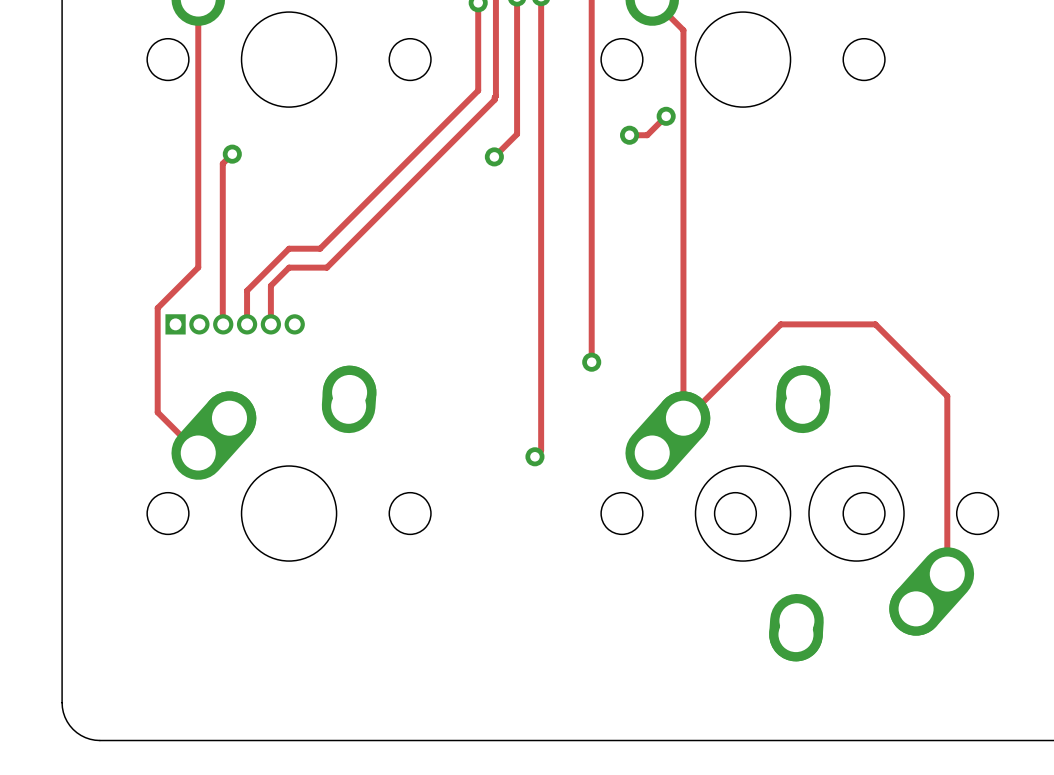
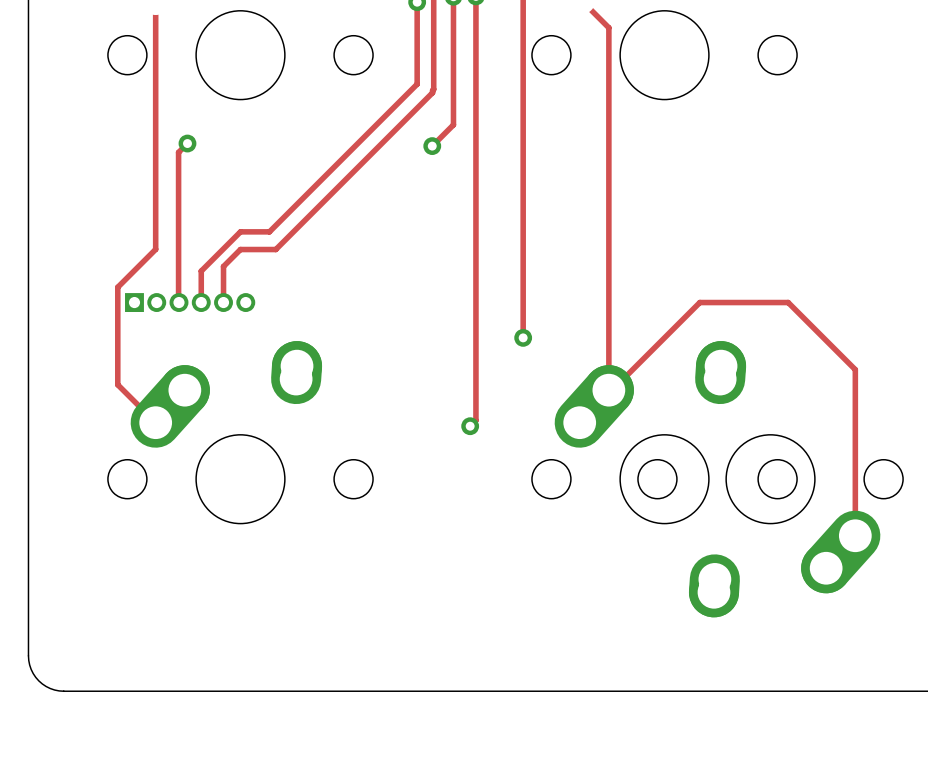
track: (666, 116) (647, 135) (629, 135) -> none
via: (666, 116) -> none
via: (629, 135) -> none

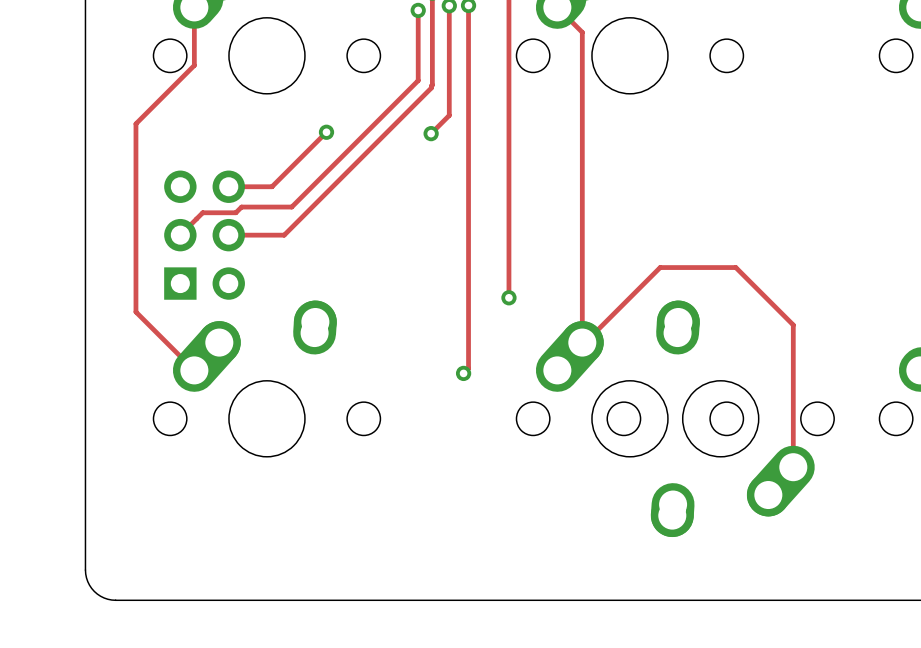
track: (155, 66) (155, 249) (117, 287) (117, 384) -> (194, 65) (135, 123) (135, 311) (161, 337)
track: (187, 143) (178, 152) (179, 302) -> none
via position: (187, 143) -> (326, 132)
track: none -> (326, 132) (272, 186) (228, 186)
track: (240, 231) (201, 271) (201, 302) (205, 298) -> (266, 207) (241, 207) (235, 212) (202, 212) (180, 235)
track: (275, 249) (240, 249) (223, 266) (222, 301) -> (297, 222) (284, 235) (228, 235)
part: none -> (204, 235)
part: (190, 302) -> none

